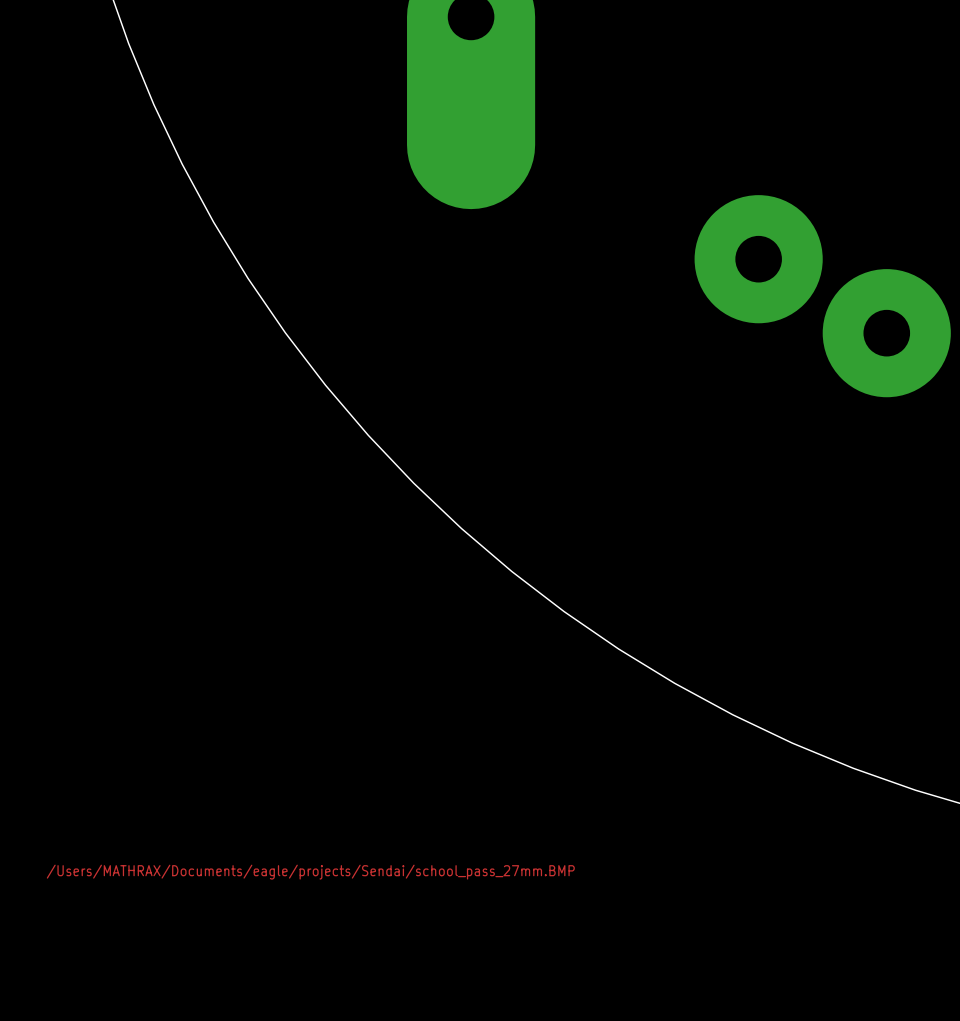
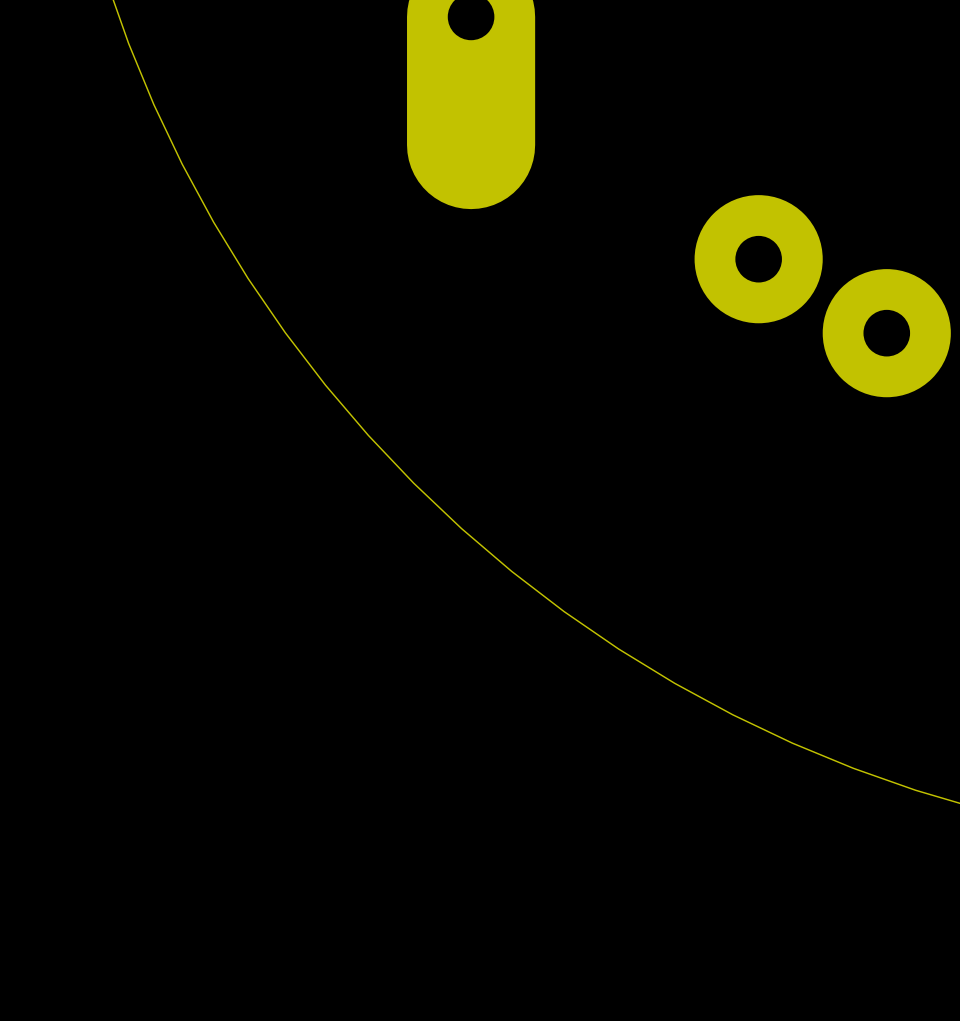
text: /Users/MATHRAX/Documents/eagle/projects/Sendai/school_pass_27mm.BMP (310, 872) -> none

